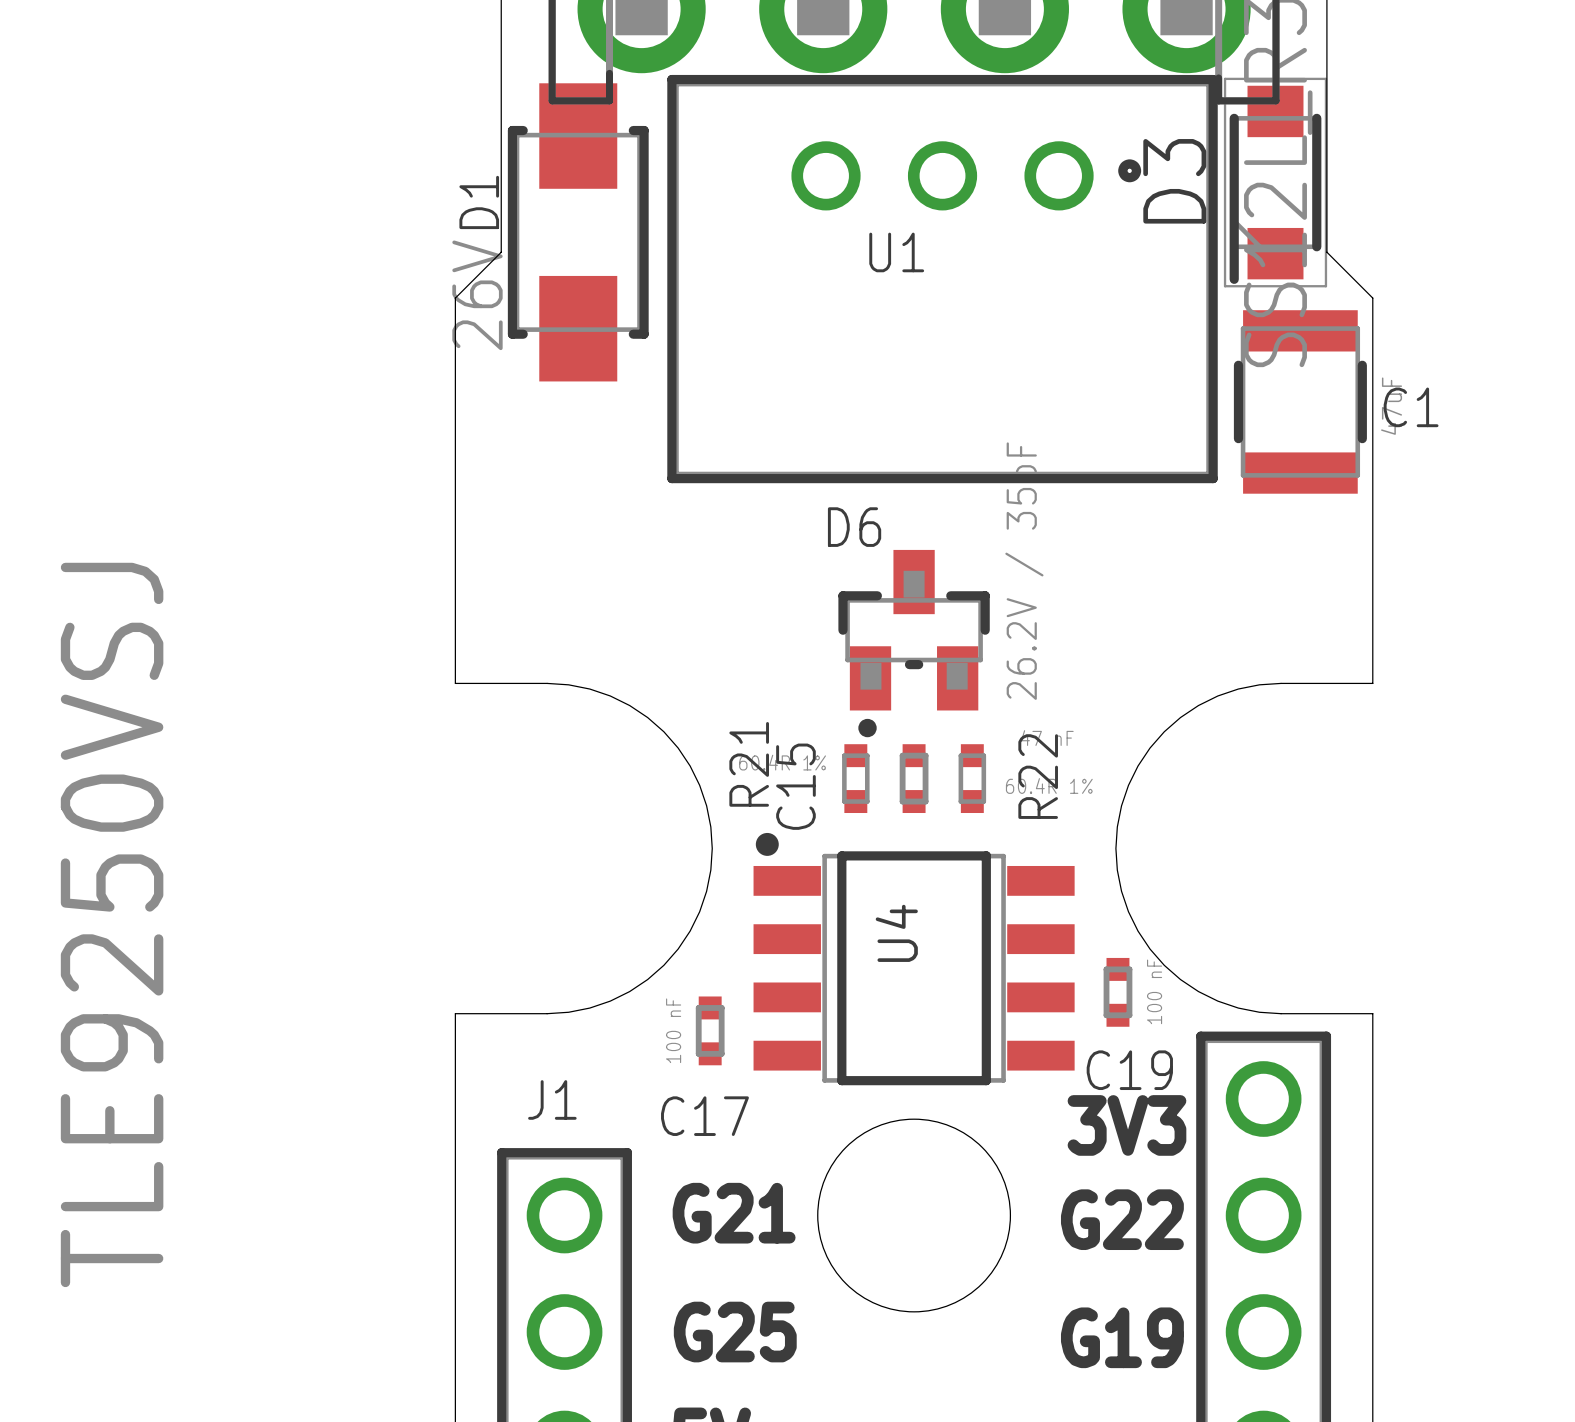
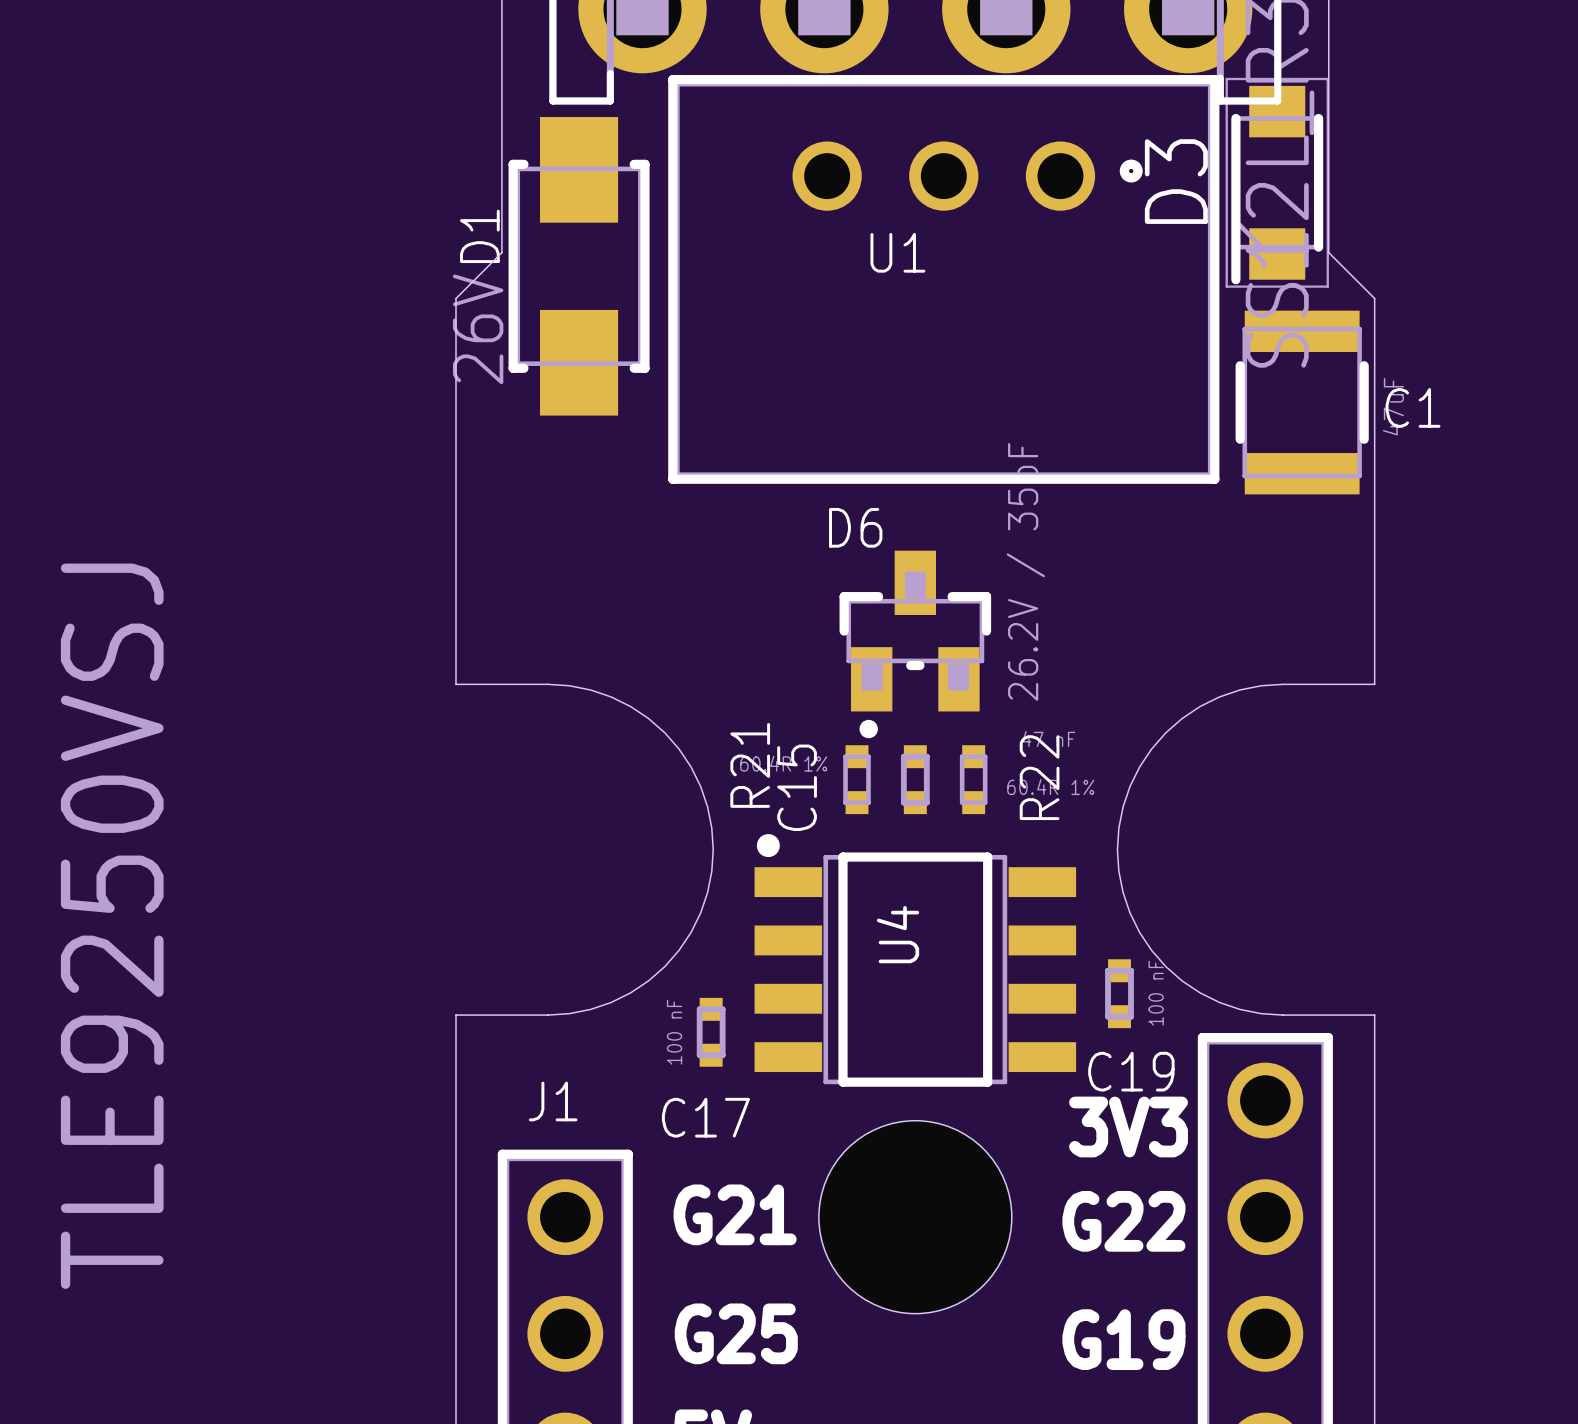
D1 position: (578, 232) -> (579, 266)

